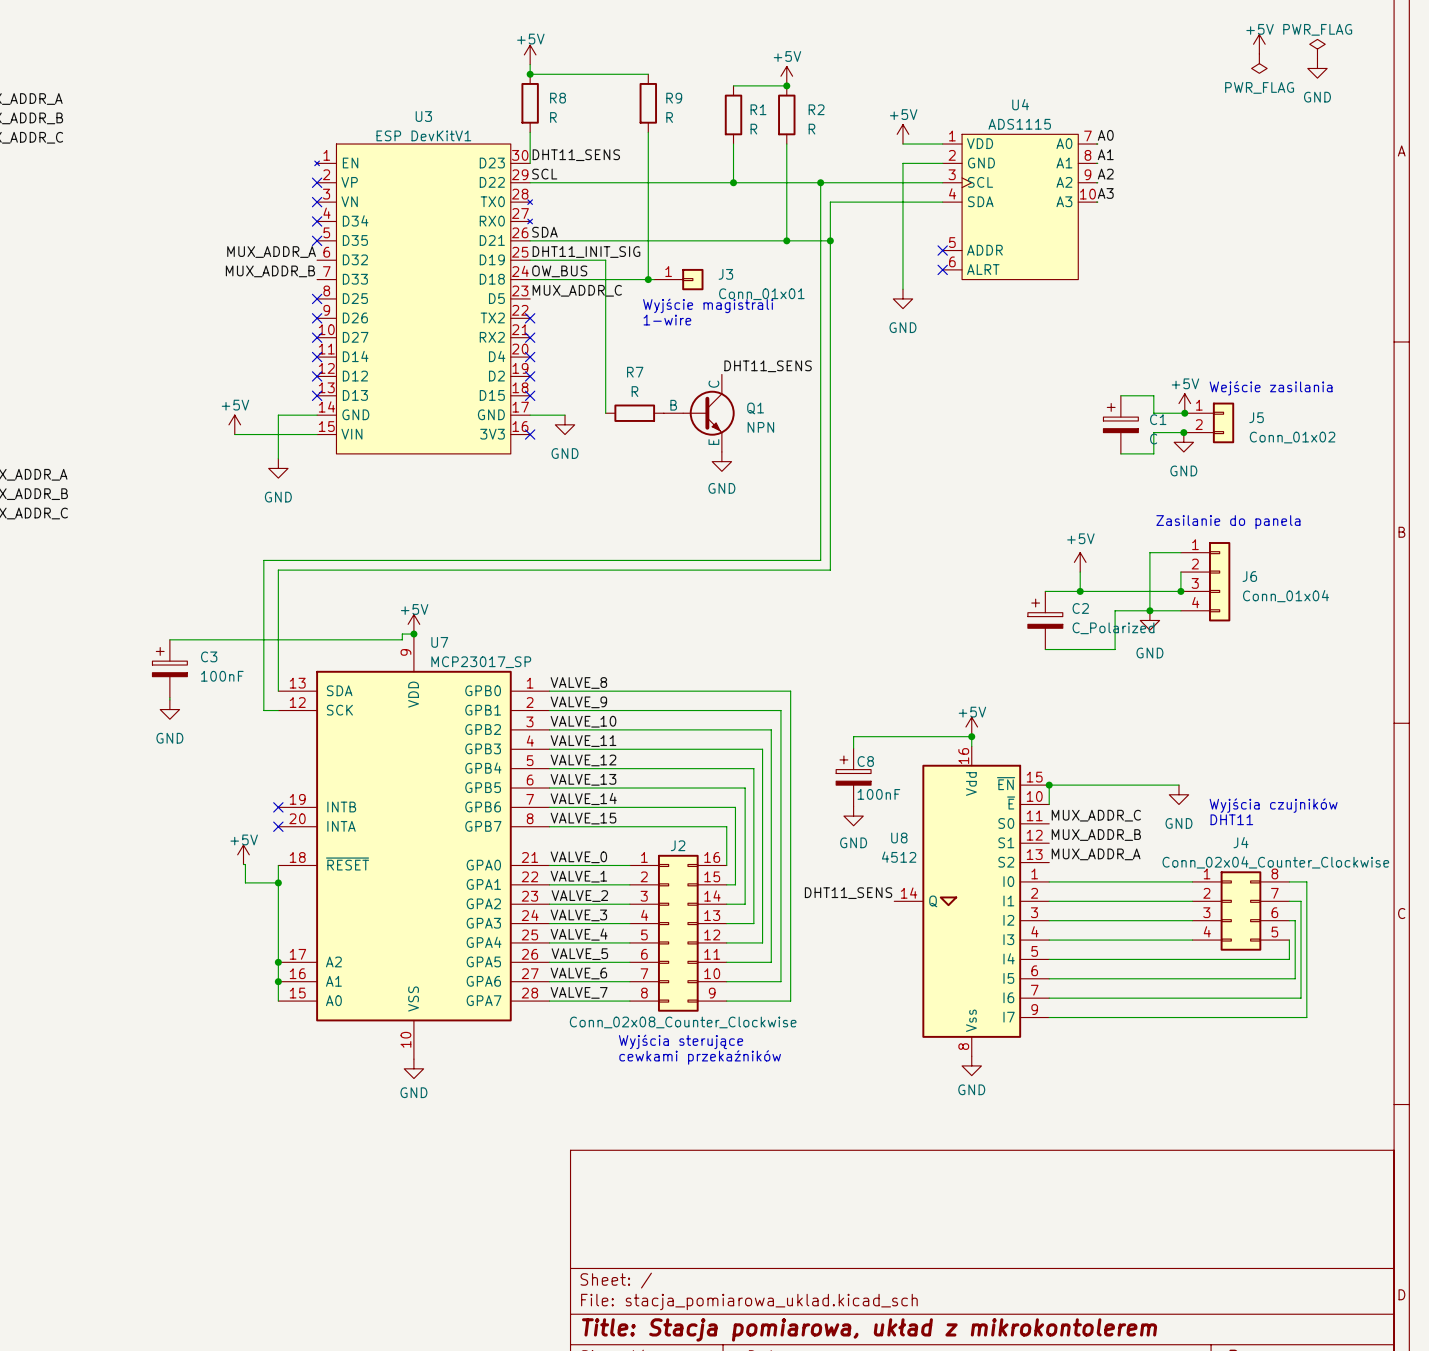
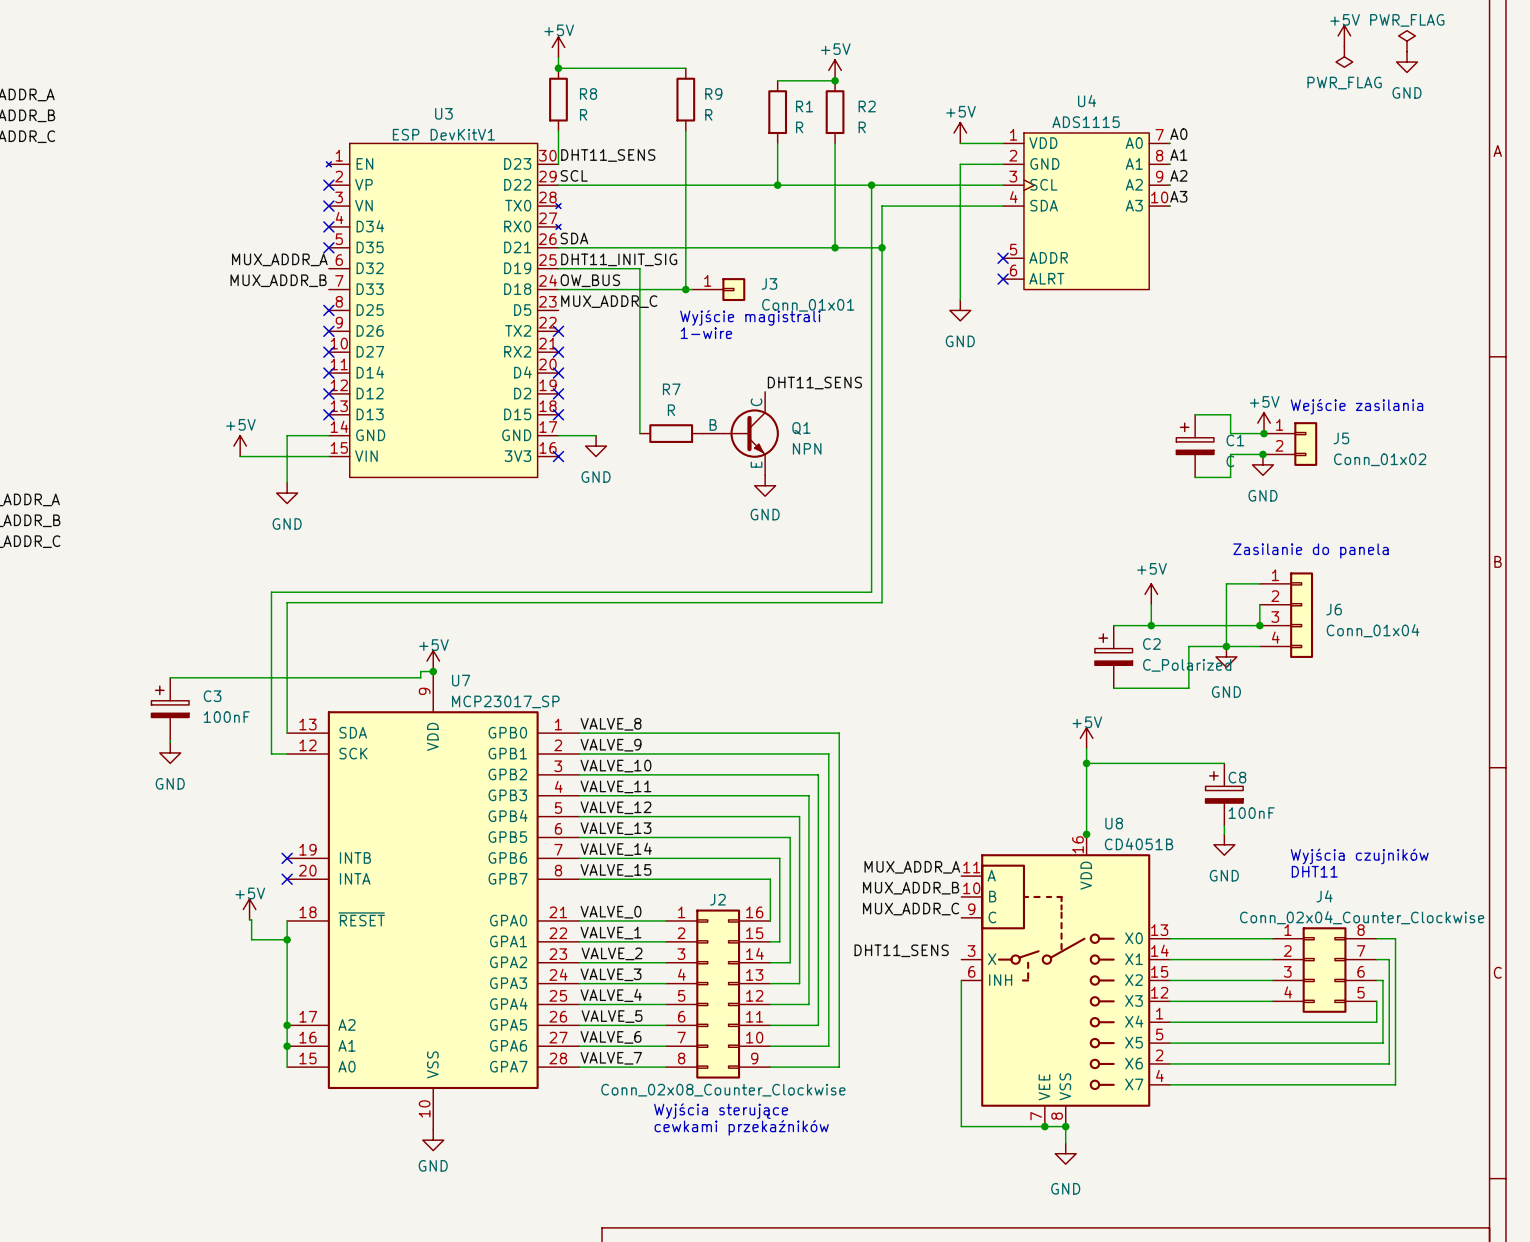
wire: none -> (1086, 748) (1086, 836)
wire: none -> (1086, 763) (1224, 763)
junction: none -> (1086, 763)
power symbol position: +5V (971, 726) -> +5V (1086, 738)
junction: (971, 736) -> none
U8 symbol: [894, 746, 1050, 1057] -> [961, 834, 1171, 1127]
wire: (971, 746) (971, 736) (853, 736) (853, 748) -> none
C8 position: (853, 777) -> (1224, 794)
wire: none -> (1224, 826) (1224, 834)
junction position: (1049, 785) -> (1086, 834)
wire: (1178, 785) (1049, 785) (1049, 804) -> none
power symbol position: GND (1178, 794) -> GND (1224, 844)
label position: MUX_ADDR_C (1096, 815) -> MUX_ADDR_C (911, 909)
power symbol: GND (853, 816) -> none
label position: MUX_ADDR_B (1096, 835) -> MUX_ADDR_B (911, 888)
U8 name position: U8 (899, 838) -> U8 (1114, 823)
label position: MUX_ADDR_A (1096, 854) -> MUX_ADDR_A (912, 867)
U8 value: 4512 (899, 857) -> CD4051B (1139, 844)
wire: none -> (961, 980) (961, 1126) (1065, 1126) (1065, 1143)
junction: none -> (1044, 1126)
junction: none -> (1065, 1126)
power symbol position: GND (971, 1065) -> GND (1065, 1153)
power symbol text position: GND (971, 1089) -> GND (1065, 1188)

